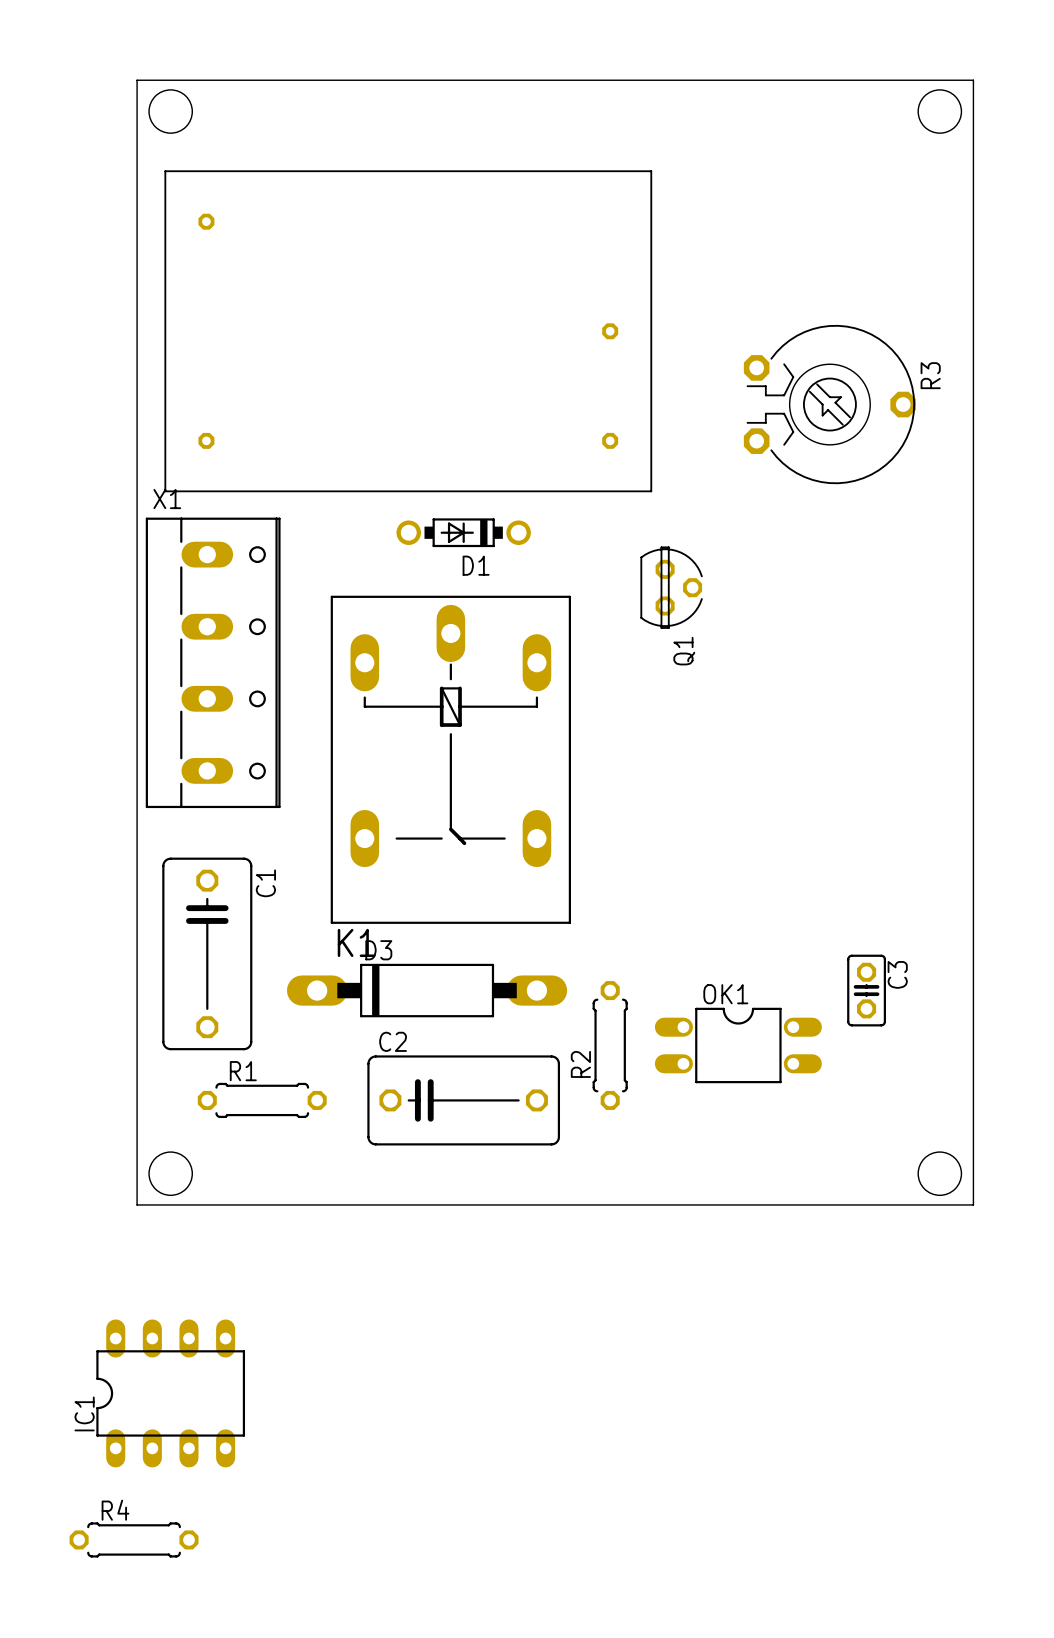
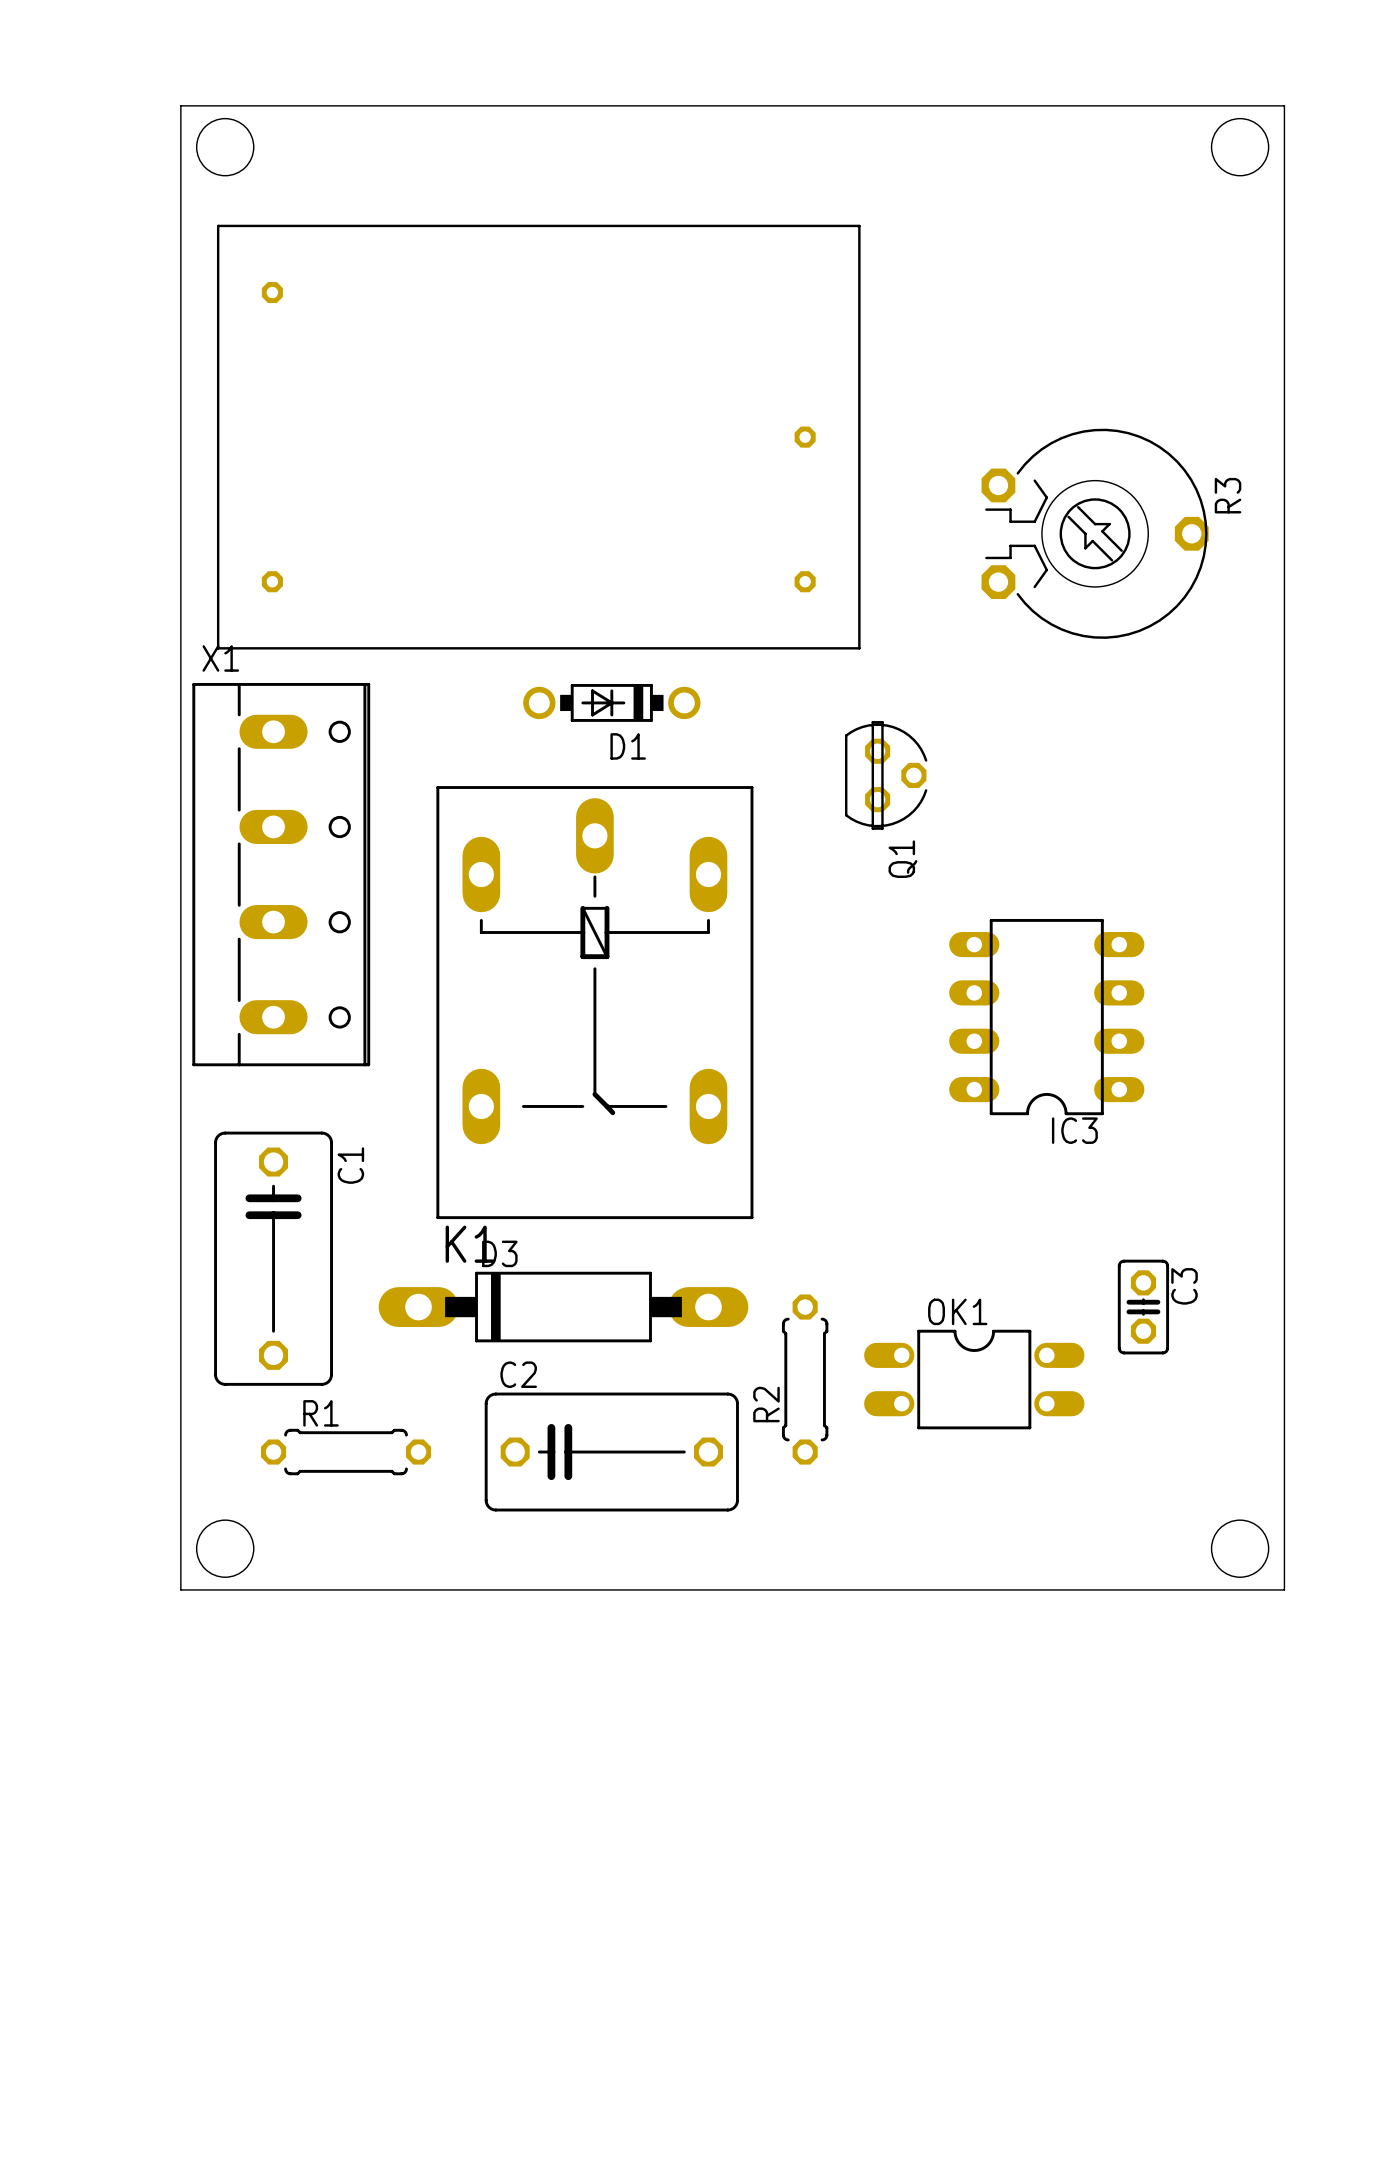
IC3: none -> (1046, 1017)
IC1: (170, 1393) -> none
R4: (134, 1539) -> none

